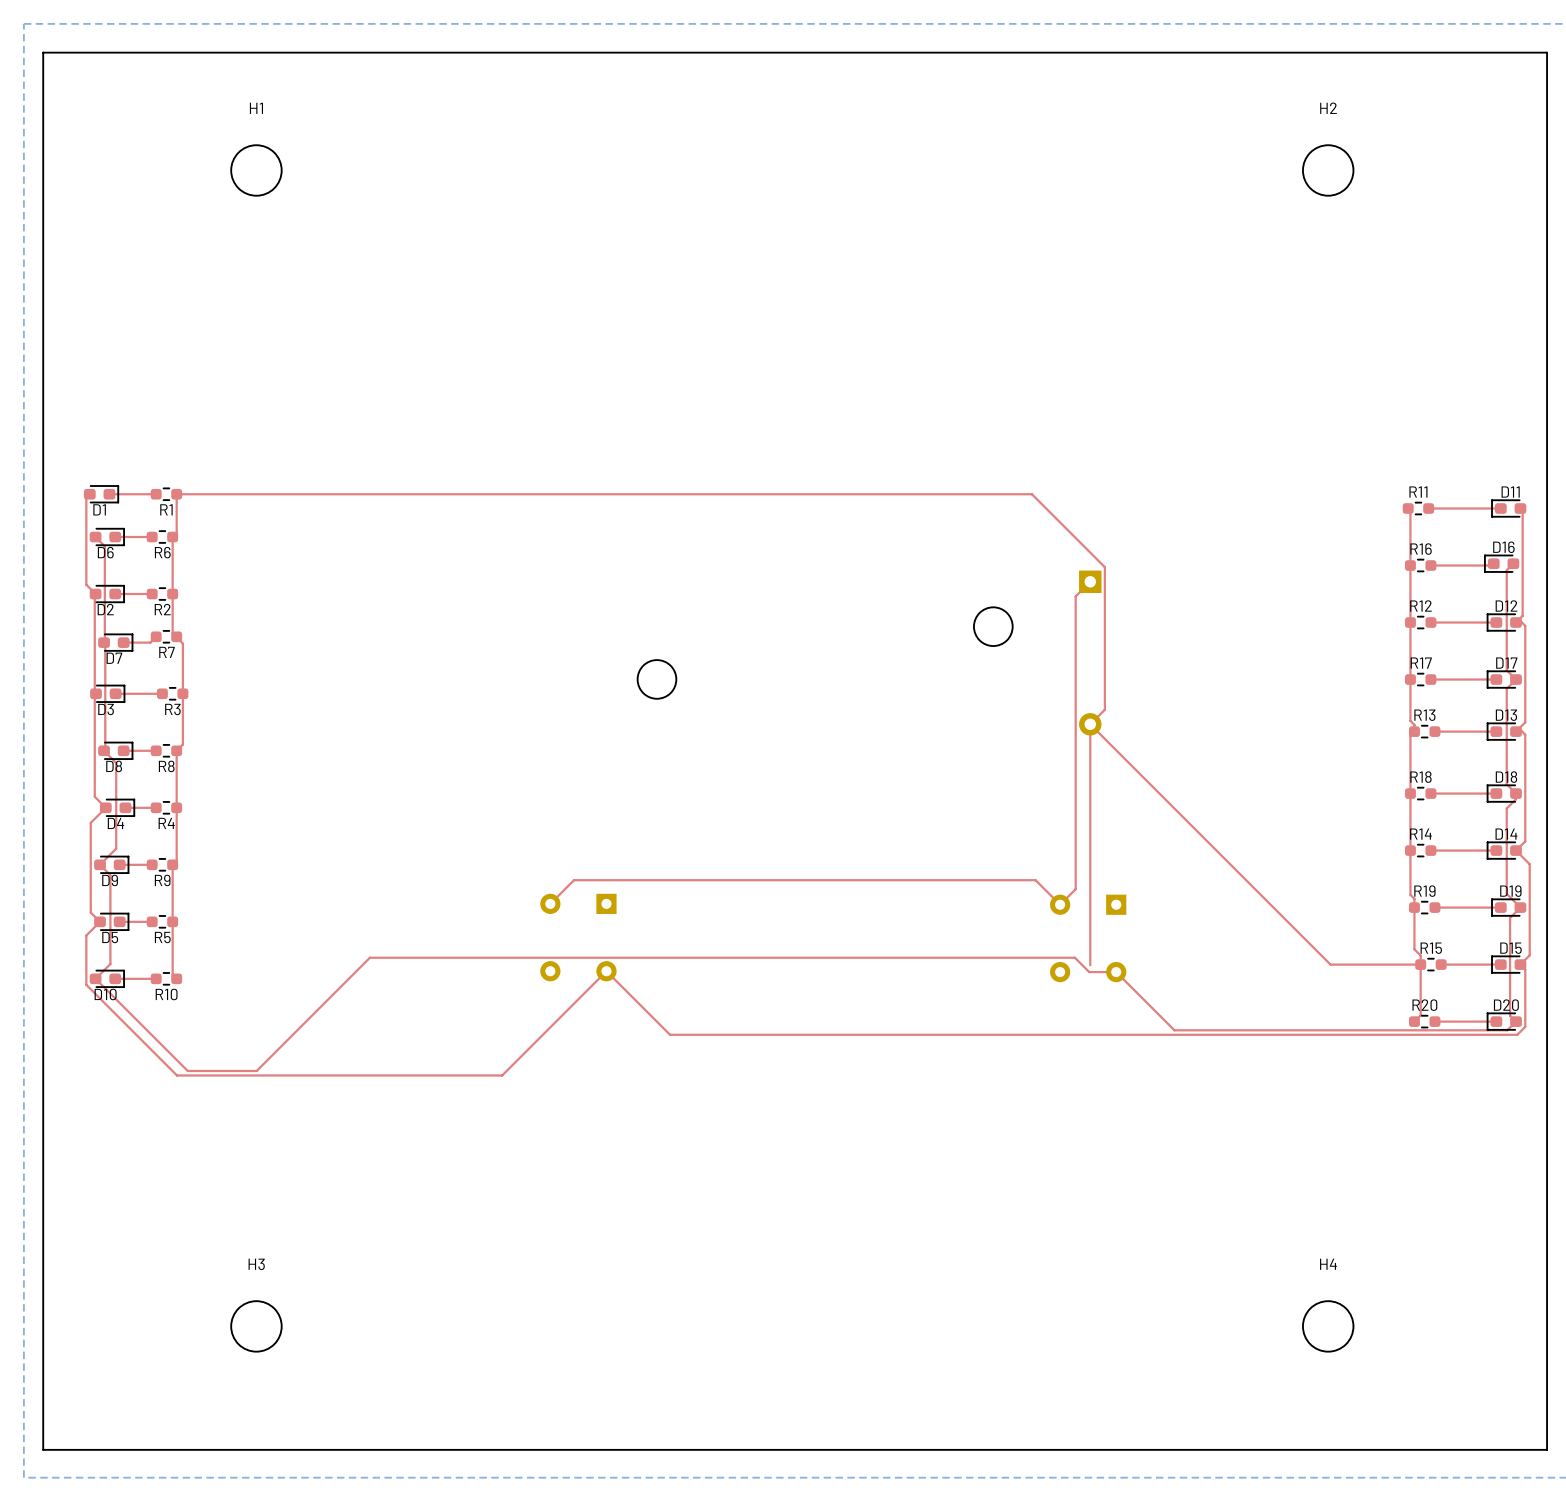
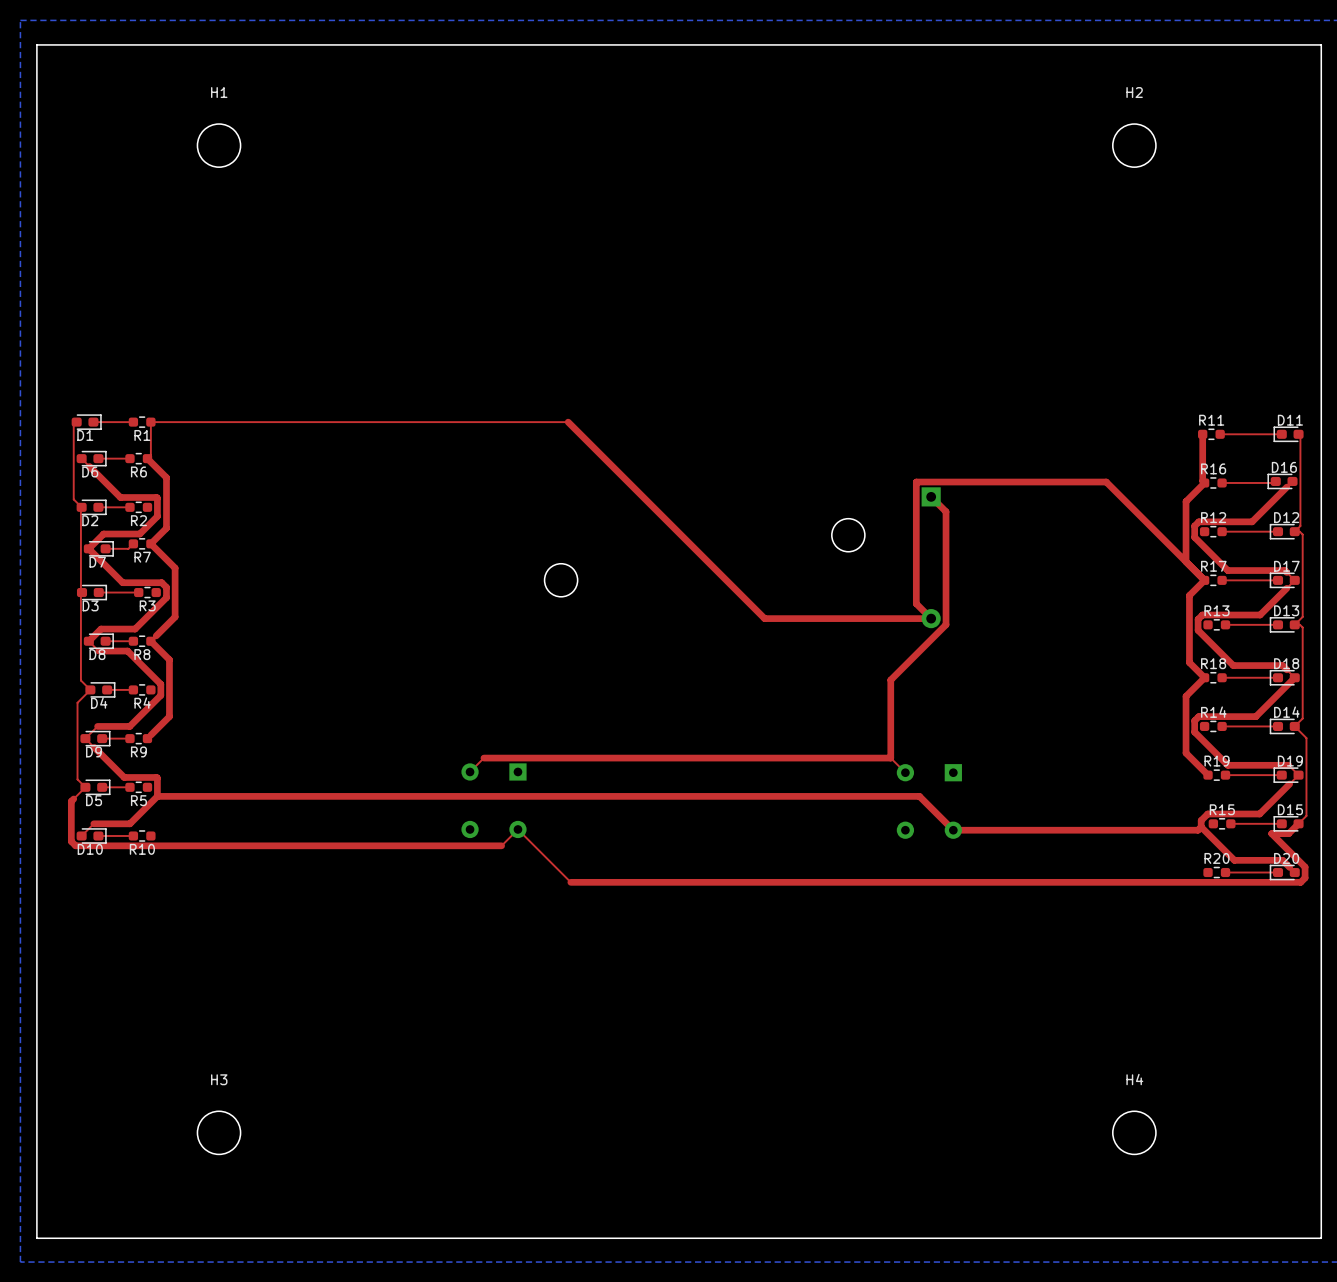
top track: (665, 494) (1031, 494) (1104, 567) (1104, 709) (1090, 724) -> (568, 422) (764, 618) (931, 618) (916, 603) (916, 482) (1106, 482) (1204, 580) (1189, 595) (1189, 662) (1204, 677) (1186, 696) (1186, 753) (1208, 775)
top track: (1408, 508) (1410, 510) (1410, 720) (1414, 724) (1414, 731) (1410, 735) (1410, 894) (1414, 898) (1414, 949) (1420, 955) (1420, 1015) (1414, 1021) -> (1202, 434) (1202, 481) (1204, 482) (1186, 501) (1186, 561)
top track: (172, 537) (172, 632) (182, 643) (182, 744) -> (147, 458) (166, 477) (166, 528) (150, 543) (175, 568) (175, 617) (156, 635)
top track: (104, 546) (104, 641) -> (89, 466) (120, 497) (157, 498) (157, 516) (139, 534) (103, 534) (89, 548)
top track: (1506, 570) (1506, 670) -> (1286, 487) (1252, 521) (1198, 521) (1194, 526) (1194, 537) (1227, 570) (1284, 570) (1286, 572)
top track: (1090, 581) (1075, 596) (1075, 889) (1060, 904) -> none
top track: (105, 643) (105, 749) -> (89, 549) (122, 582) (161, 582) (166, 587) (166, 597) (135, 629) (101, 629) (89, 640)
top track: (1506, 688) (1506, 784) -> (1286, 588) (1260, 615) (1202, 615) (1198, 619) (1198, 630) (1233, 665) (1282, 665) (1286, 669)
top track: (1090, 724) (1330, 964) (1420, 964) -> none
top track: (1090, 724) (1090, 965) -> none
top track: (176, 750) (176, 860) -> (150, 641) (169, 659) (169, 716) (150, 735)
top track: (115, 762) (116, 848) (114, 850) -> (98, 651) (127, 651) (160, 684) (160, 695) (129, 726) (97, 726)
top track: (1516, 793) (1516, 799) (1506, 808) (1506, 893) (1508, 896) -> (1294, 677) (1255, 716) (1198, 716) (1194, 720) (1194, 732) (1227, 765) (1288, 765)
top track: (172, 864) (172, 974) (176, 978) -> none
top track: (110, 875) (109, 964) -> (94, 747) (124, 777) (156, 777) (157, 796)
top track: (566, 887) (574, 880) (1035, 880) (1042, 887) -> (483, 758) (890, 758) (890, 680) (946, 624) (946, 511) (931, 496)
top track: (1510, 917) (1510, 1015) -> (1289, 783) (1259, 814) (1207, 814) (1201, 820) (1201, 827)
top track: none -> (157, 796) (129, 823) (93, 823)
top track: none -> (157, 796) (919, 796) (953, 830) (1198, 830) (1201, 827)
top track: (86, 935) (86, 984) (176, 1075) (502, 1075) (587, 990) -> (73, 798) (71, 801) (71, 841) (75, 845) (501, 845)
top track: (1520, 964) (1525, 969) (1525, 1026) (1517, 1034) (670, 1034) (668, 1033) -> (1298, 823) (1288, 833) (1271, 833) (1305, 867) (1305, 877) (1300, 882) (570, 882)
top track: none -> (1201, 827) (1234, 860) (1282, 860) (1289, 867)
top track: (95, 978) (187, 1070) (256, 1070) (369, 957) (1074, 957) (1089, 972) (1116, 972) (1174, 1030) (1507, 1030) (1516, 1021) -> none

